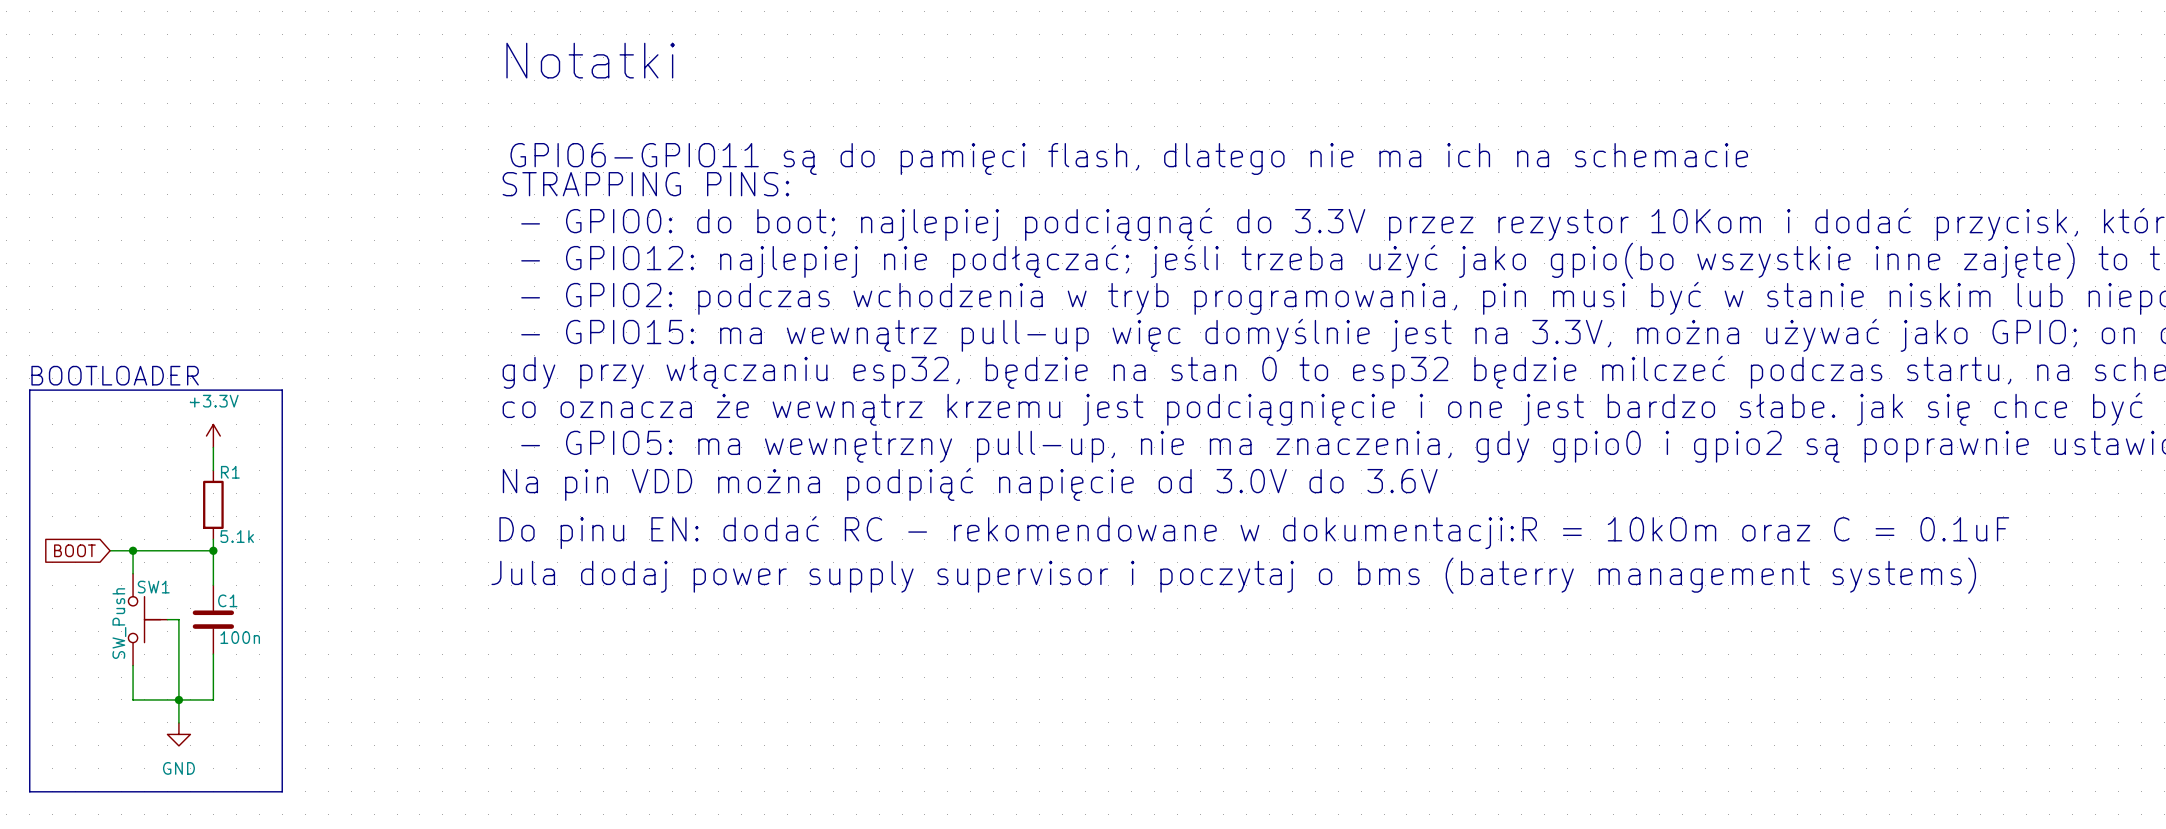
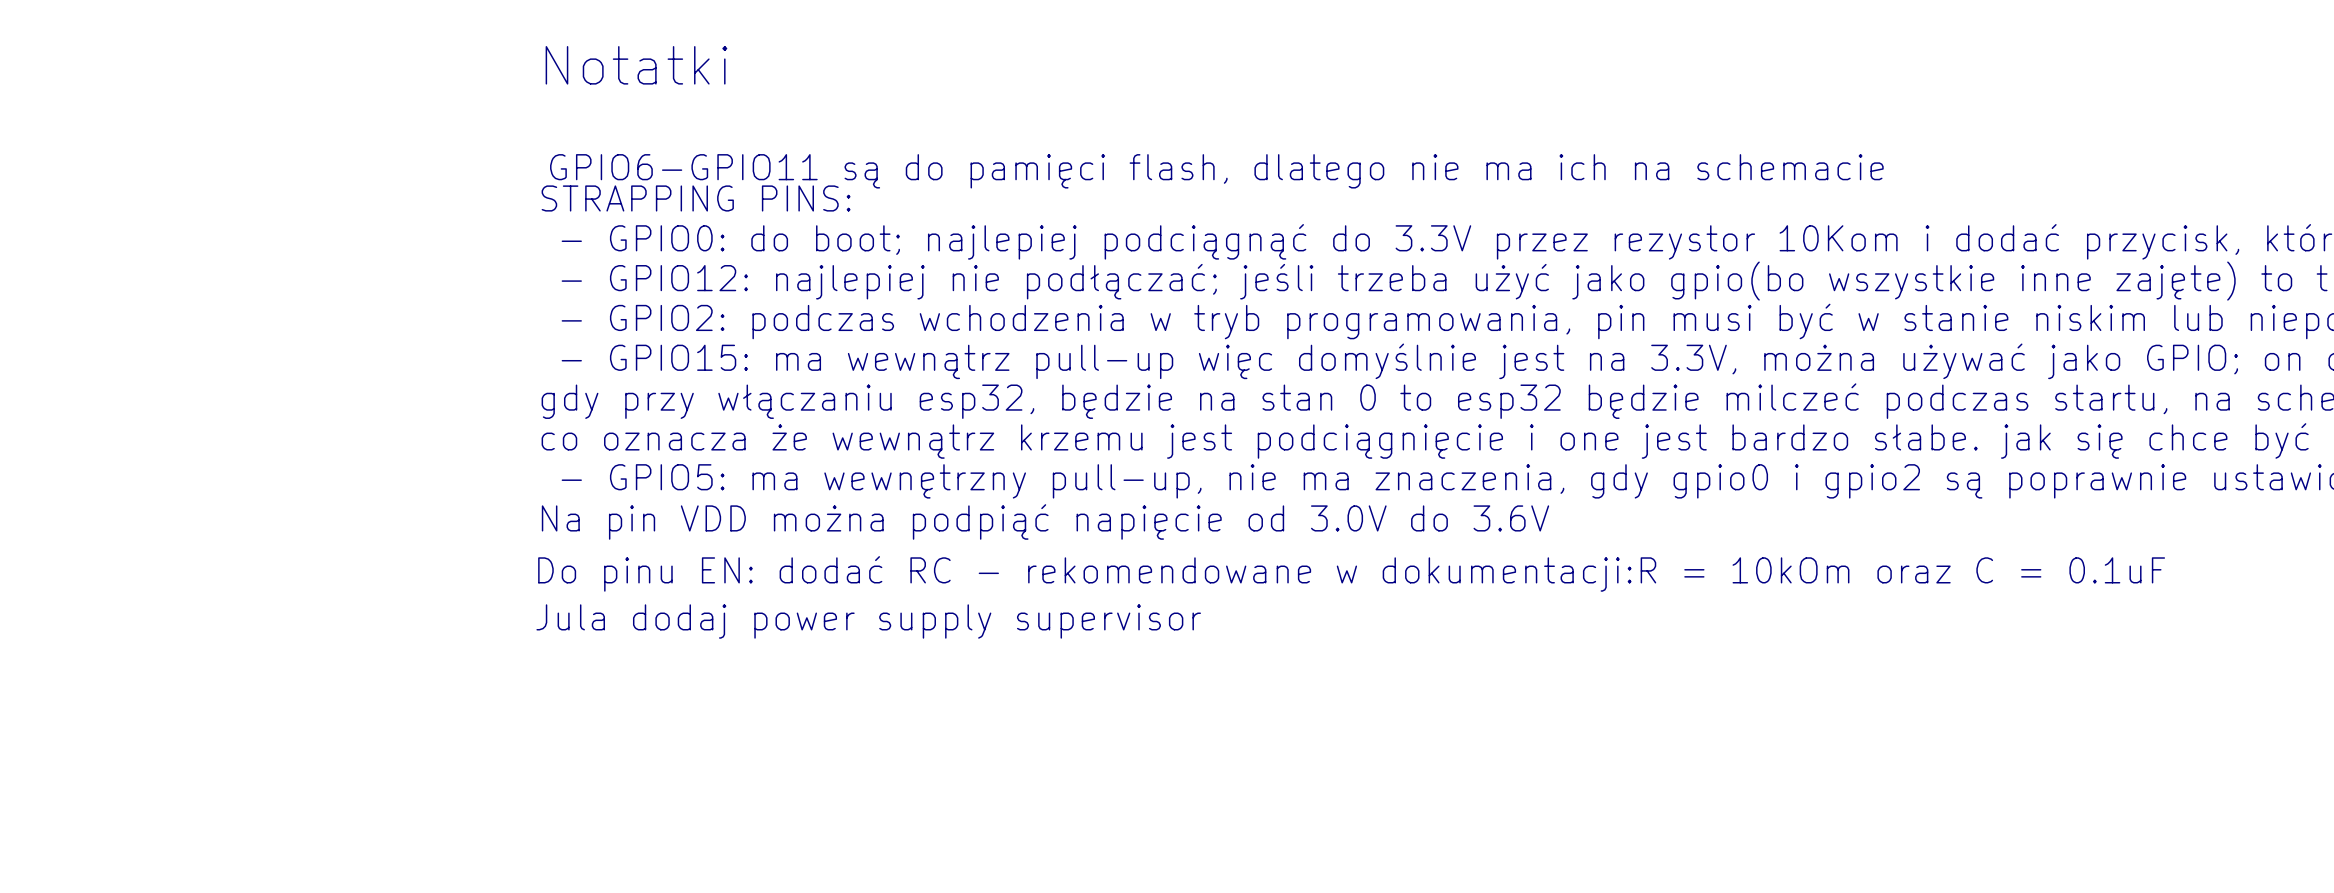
text: BOOTLOADER (115, 375) -> none
line: (29, 390) (282, 390) (282, 791) (29, 791) (29, 390) -> none
power symbol: +3.3V (213, 436) -> none
wire: (213, 447) (213, 470) -> none
R1: 5.1k (213, 504) -> none
wire: (213, 539) (213, 585) -> none
global label: BOOT (74, 550) -> none
wire: (110, 550) (213, 550) -> none
wire: (133, 550) (133, 573) -> none
junction: (133, 550) -> none
junction: (213, 550) -> none
text: Jula dodaj power supply supervisor i poczytaj o bms (baterry management systems) (1233, 575) -> none
text: none -> Jula dodaj power supply supervisor (868, 621)
SW1: SW_Push (147, 619) -> none
wire: (167, 619) (178, 619) (178, 722) -> none
C1: 100n (213, 619) -> none
wire: (213, 654) (213, 699) (133, 699) (133, 665) -> none
junction: (178, 699) -> none
power symbol: GND (178, 734) -> none

